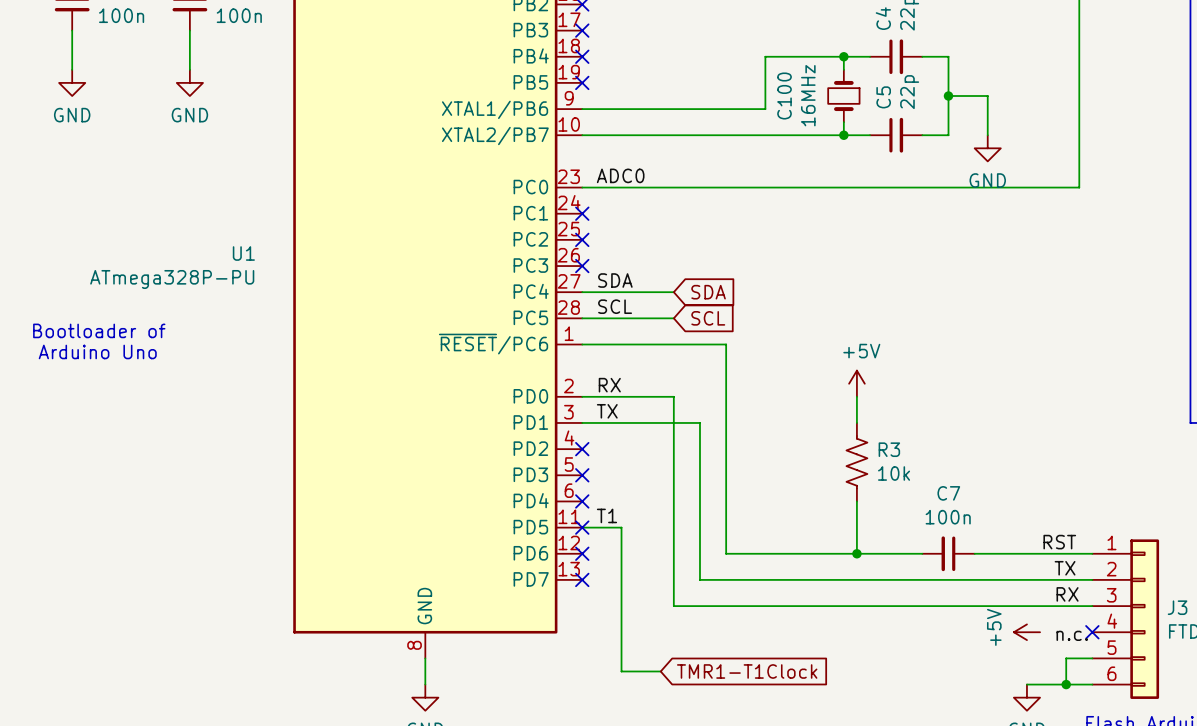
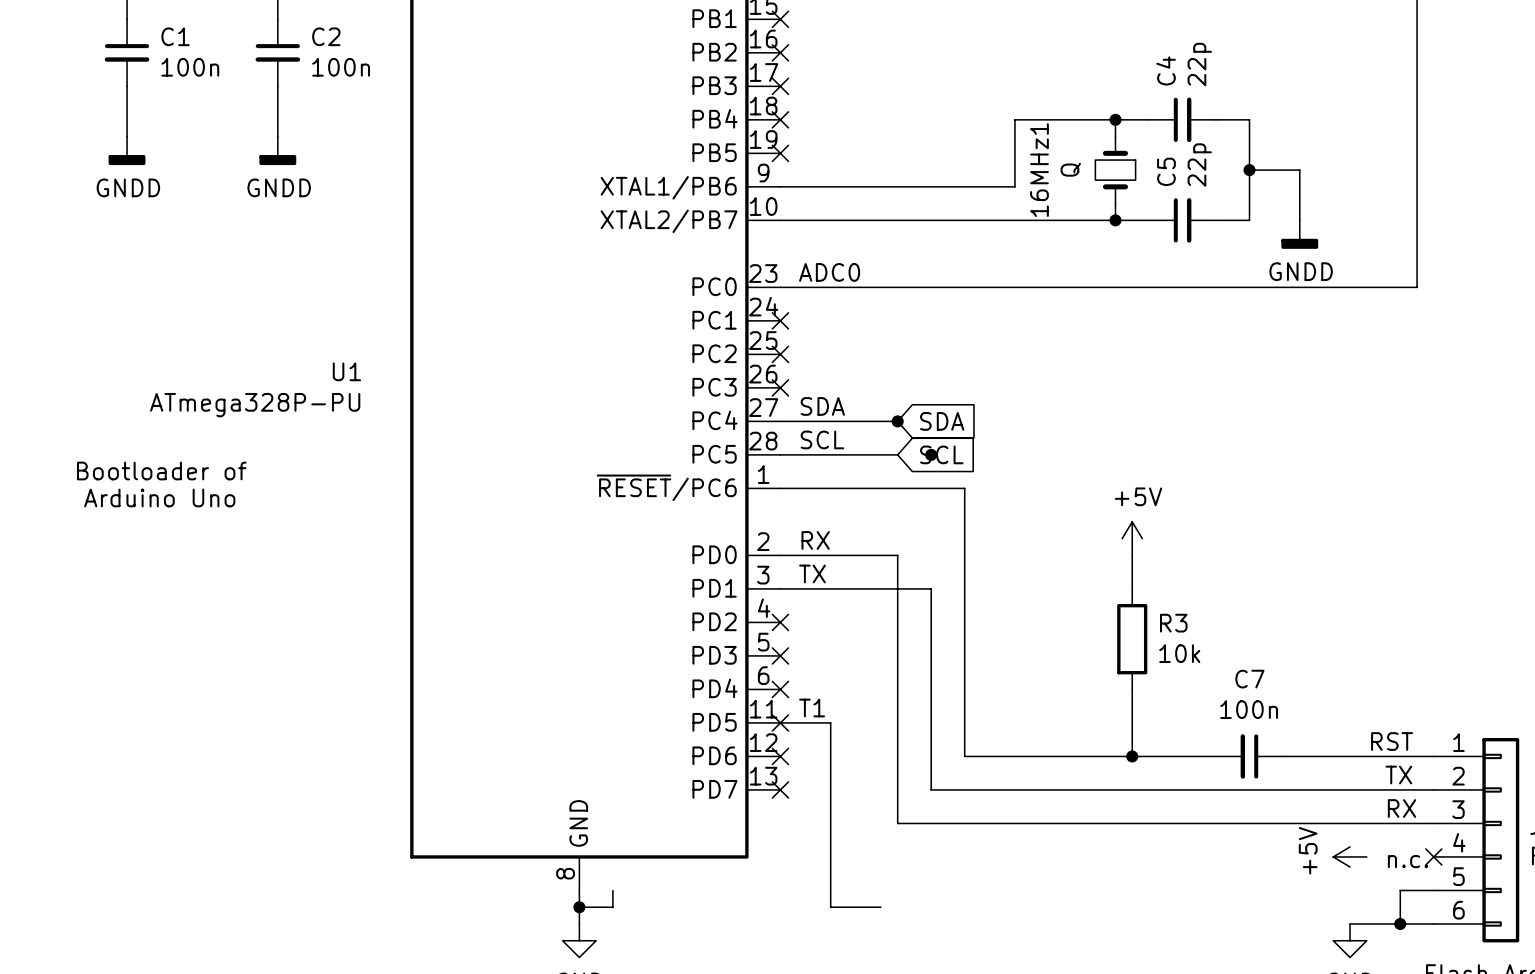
power symbol: GND (72, 82) -> GNDD (127, 150)
power symbol: GND (189, 82) -> GNDD (277, 150)
C100 value: 16MHz (808, 95) -> Q (1070, 169)
C100 name: C100 (784, 96) -> 16MHz1 (1039, 170)
power symbol: GND (987, 148) -> GNDD (1299, 234)
junction: none -> (897, 421)
junction: none -> (931, 454)
R3 symbol: [846, 422, 868, 502] -> [1117, 588, 1148, 690]
wire: none -> (612, 890) (612, 907) (579, 907)
junction: none -> (579, 907)
global label: TMR1-T1Clock (747, 671) -> none

